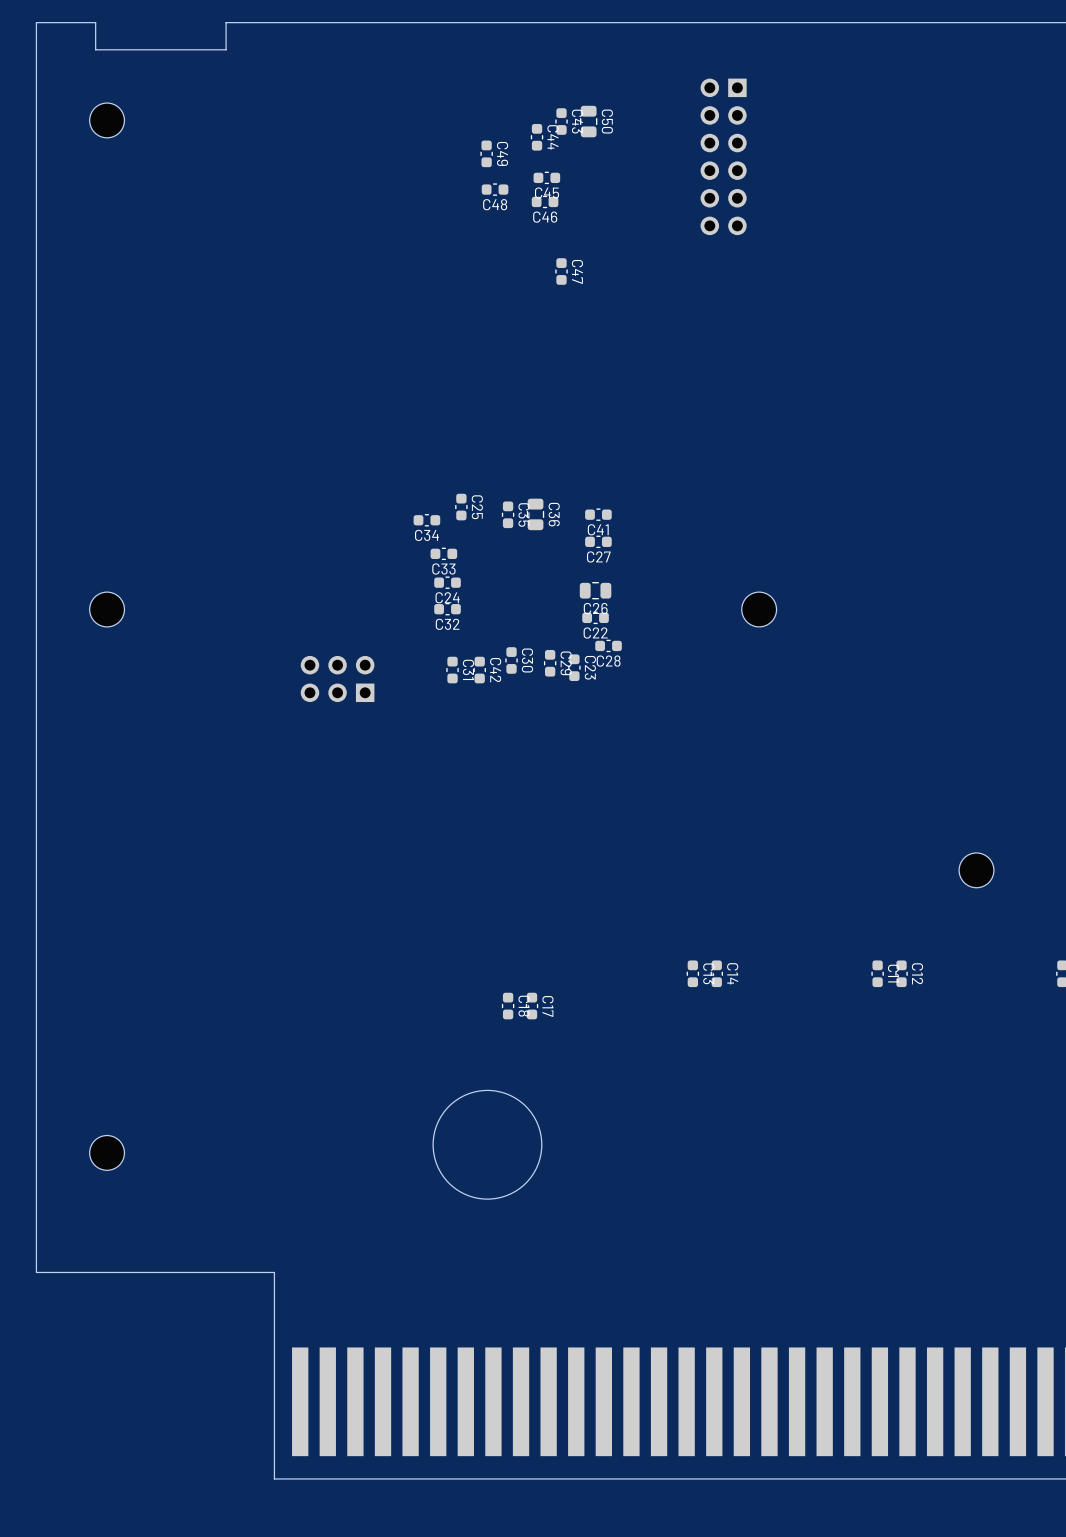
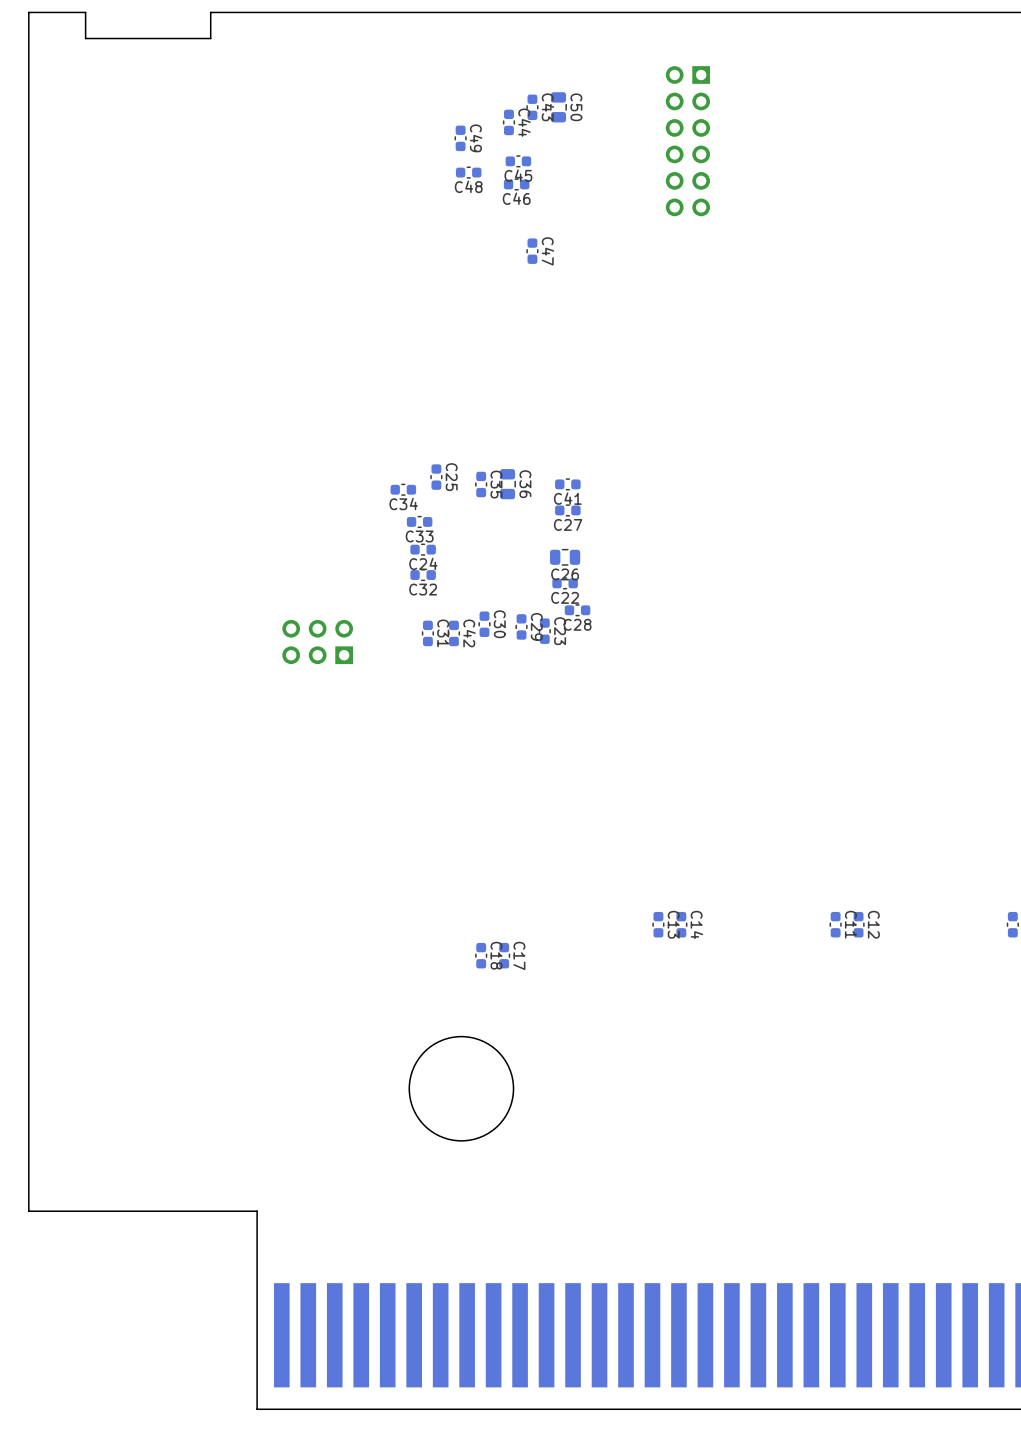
part: (107, 120) -> none
part: (107, 609) -> none
part: (759, 609) -> none
part: (976, 870) -> none
part: (107, 1152) -> none

